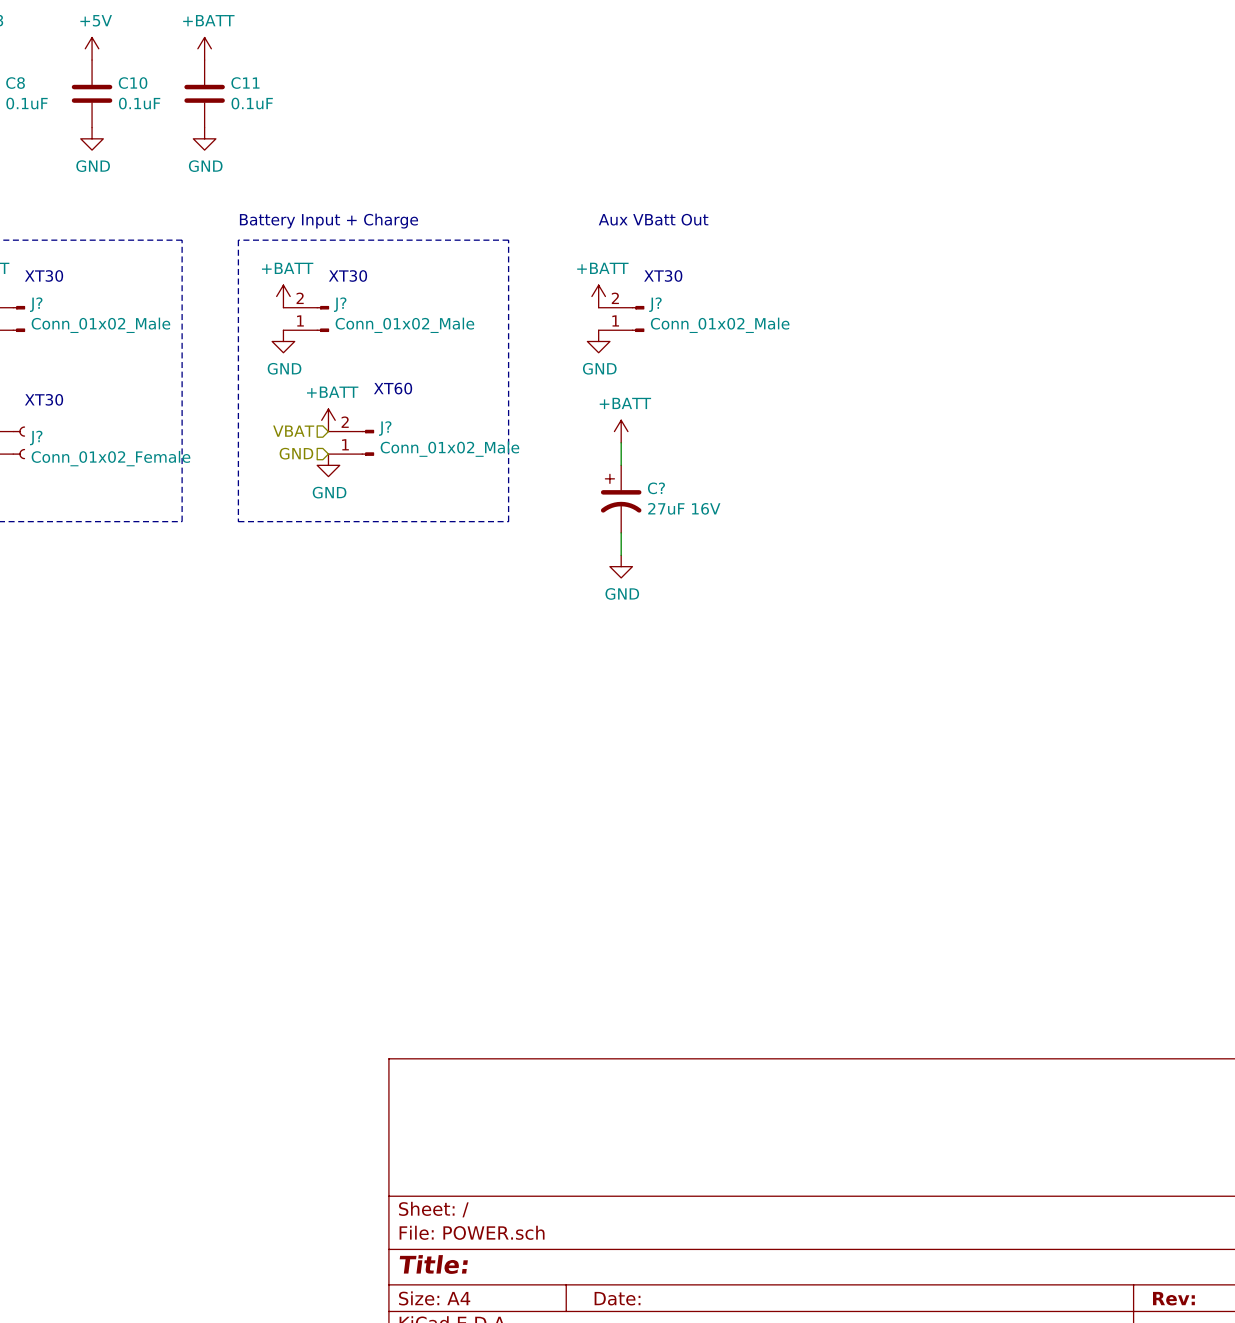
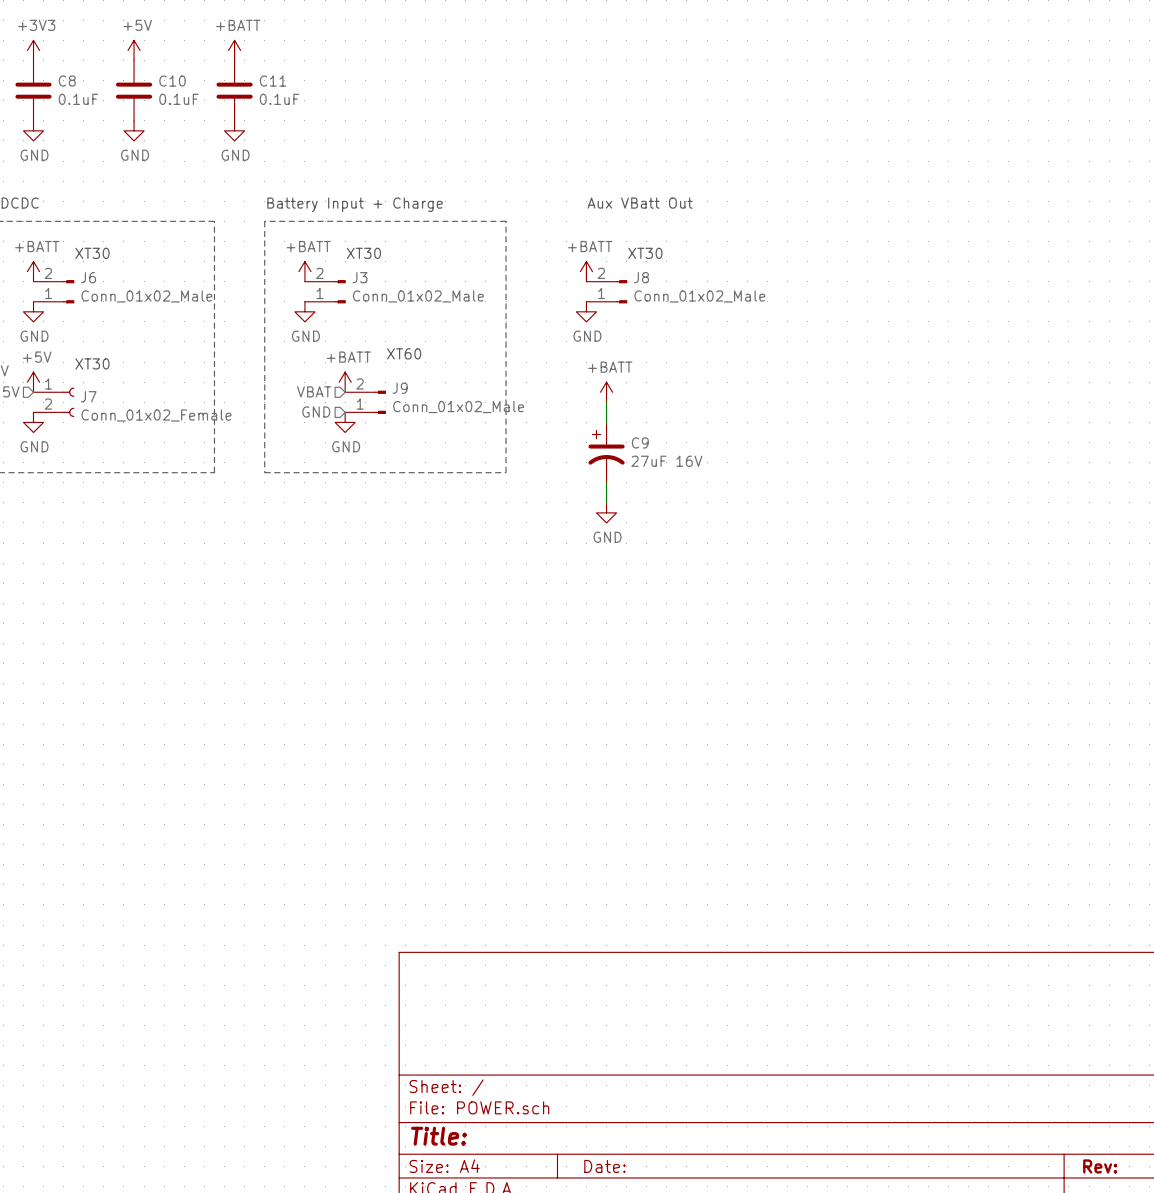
J? name: J? (36, 304) -> J6 (88, 277)
J? name: J? (340, 304) -> J3 (359, 277)
J? name: J? (655, 304) -> J8 (641, 277)
J? name: J? (385, 428) -> J9 (400, 388)
J? name: J? (36, 437) -> J7 (88, 396)
C? name: C? (656, 488) -> C9 (640, 442)

